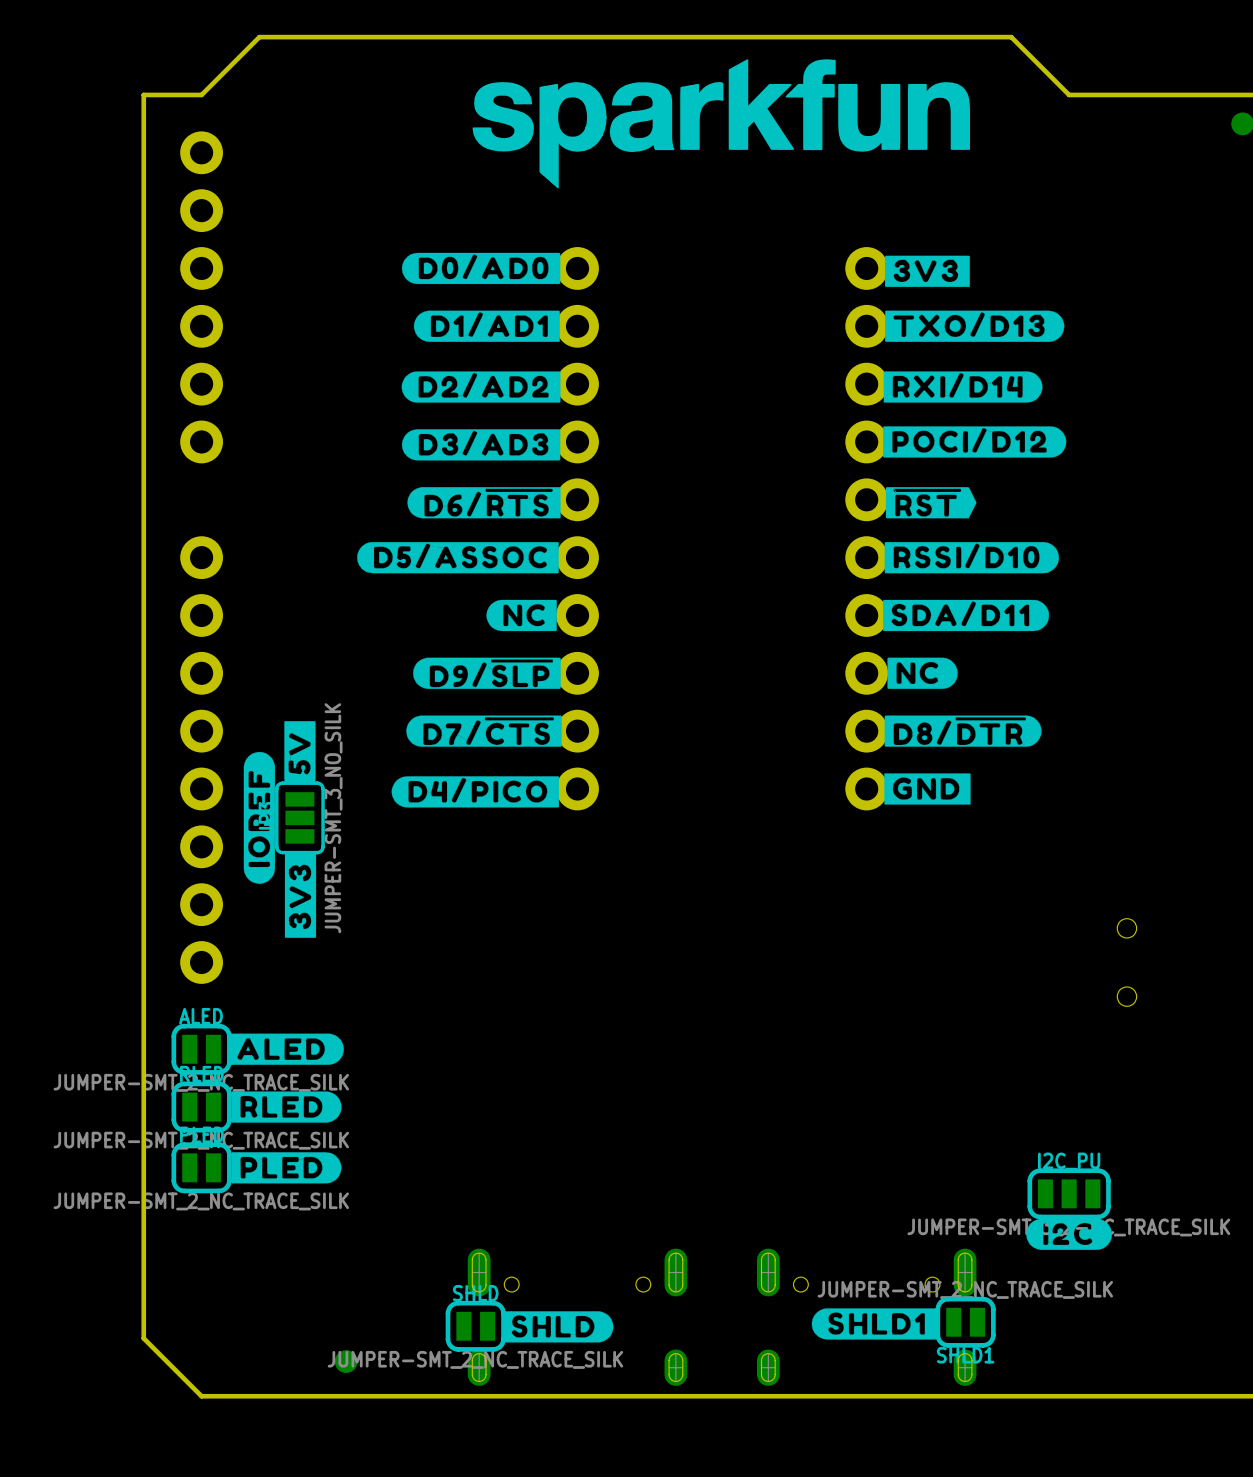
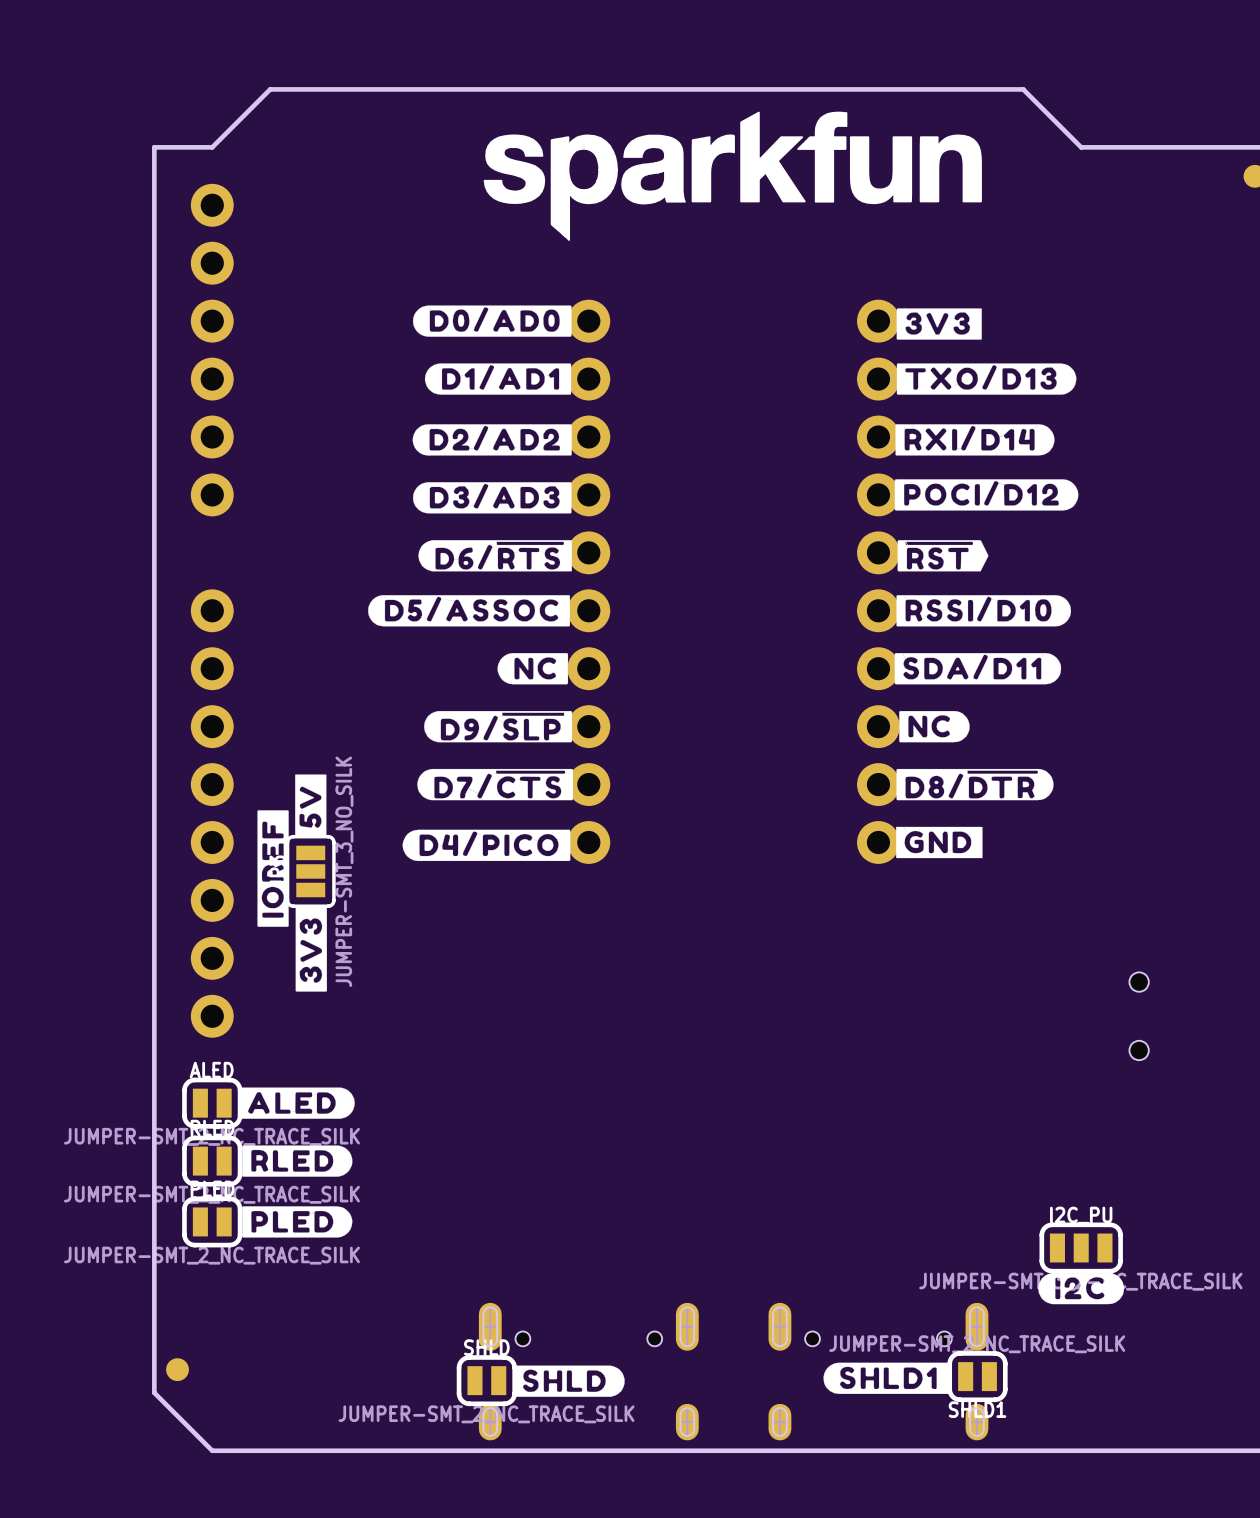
drawing shape: [243, 751, 276, 884] -> [257, 810, 289, 927]
part position: (346, 1361) -> (177, 1369)

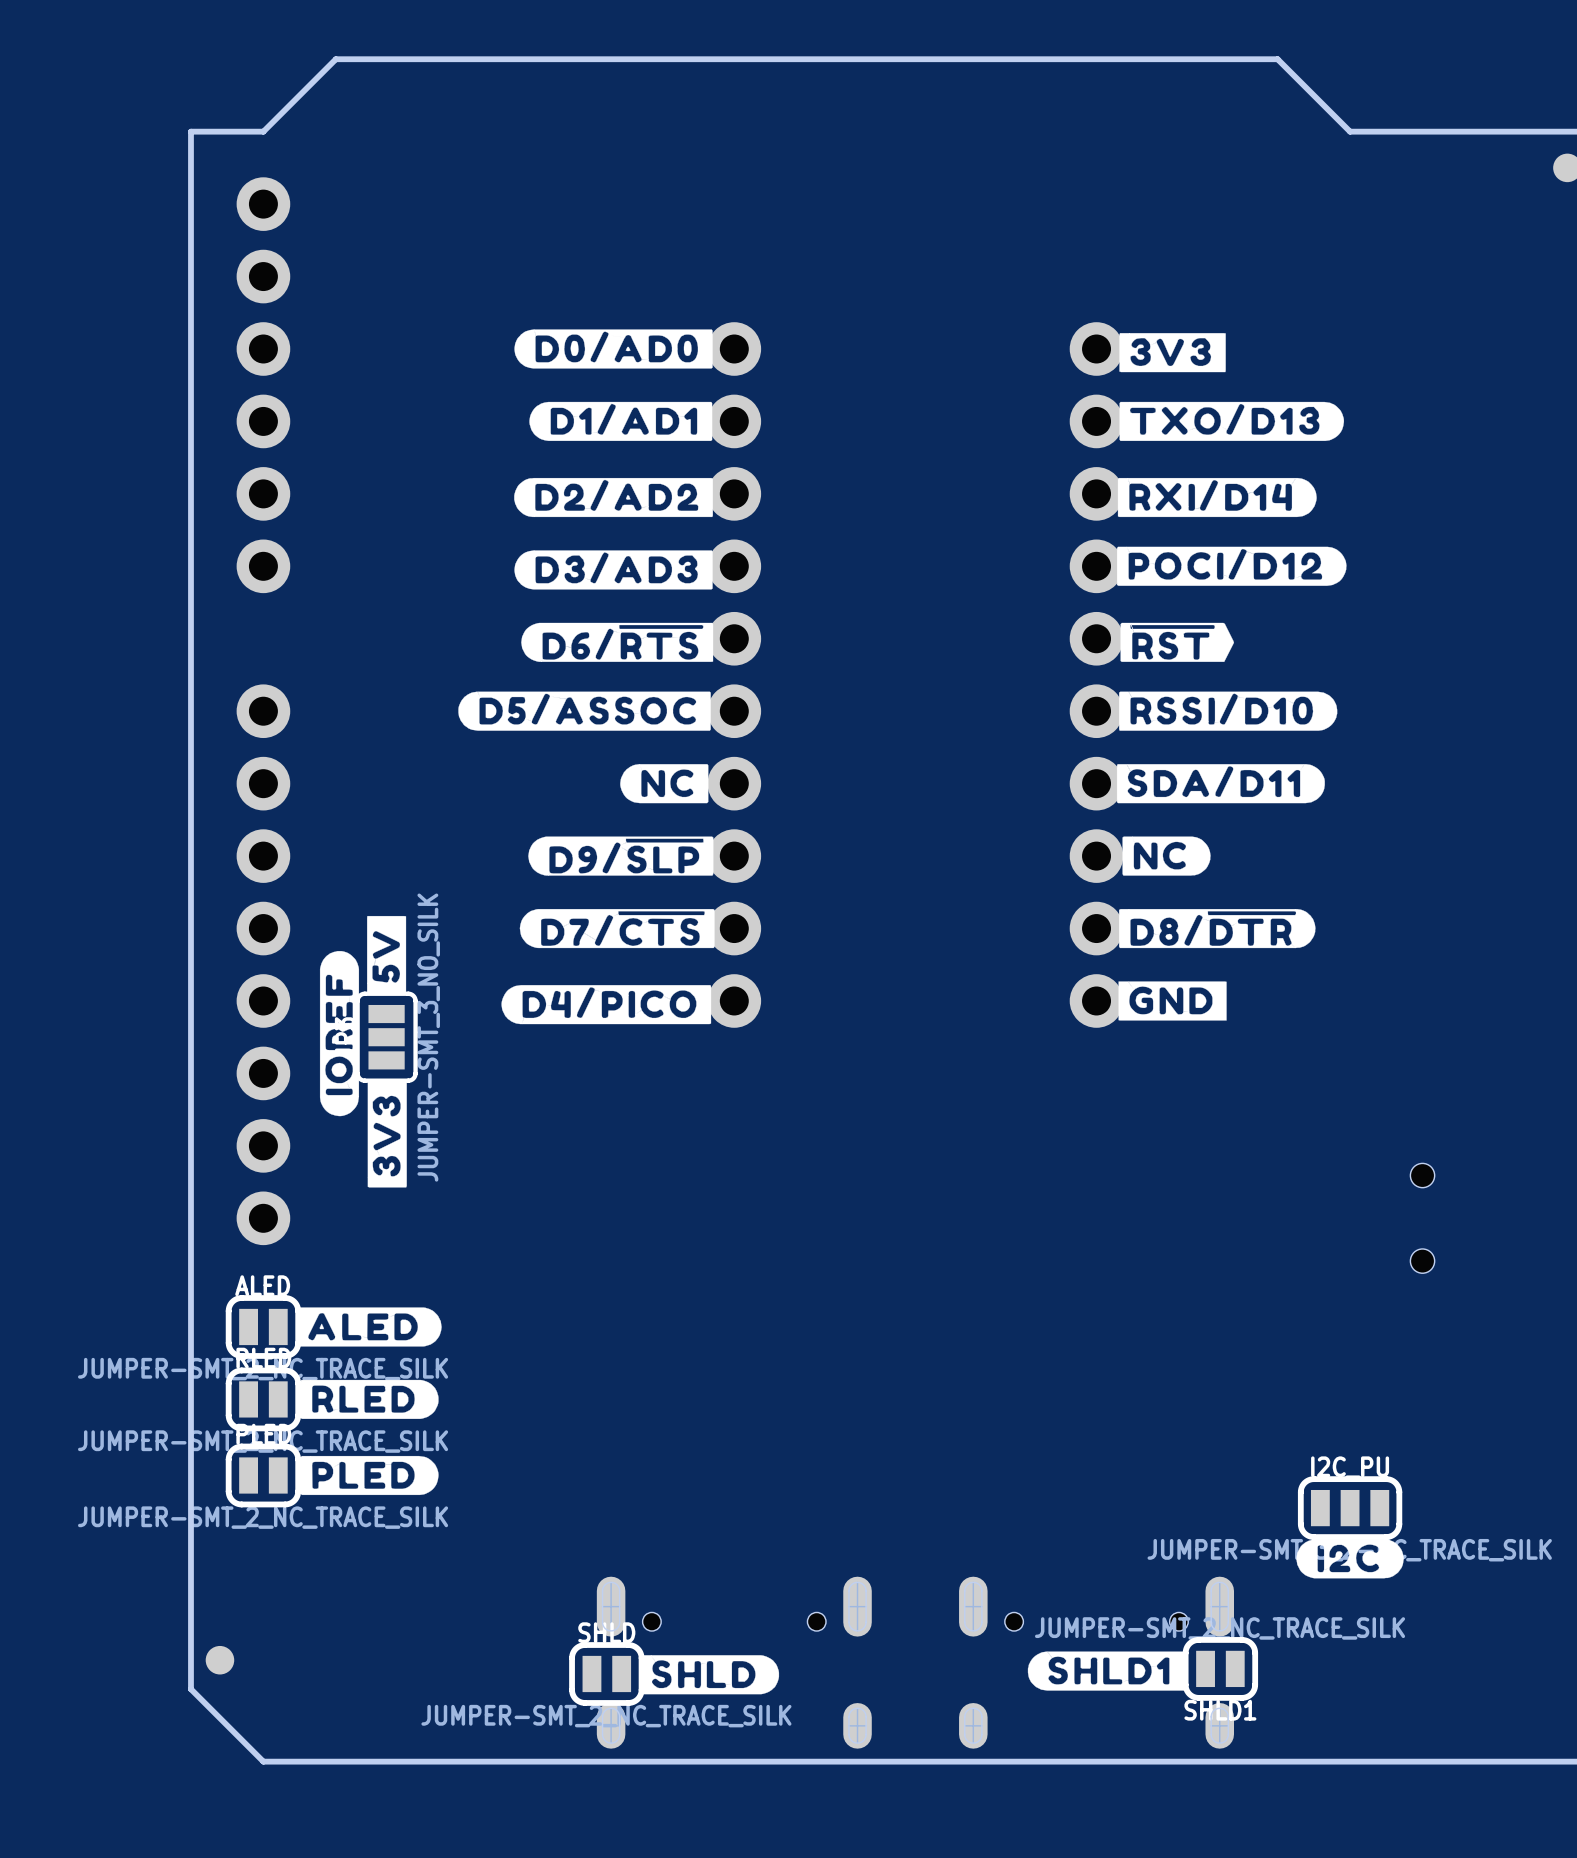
drawing: [483, 111, 982, 241] -> none
drawing shape: [257, 810, 289, 927] -> [319, 951, 360, 1117]

